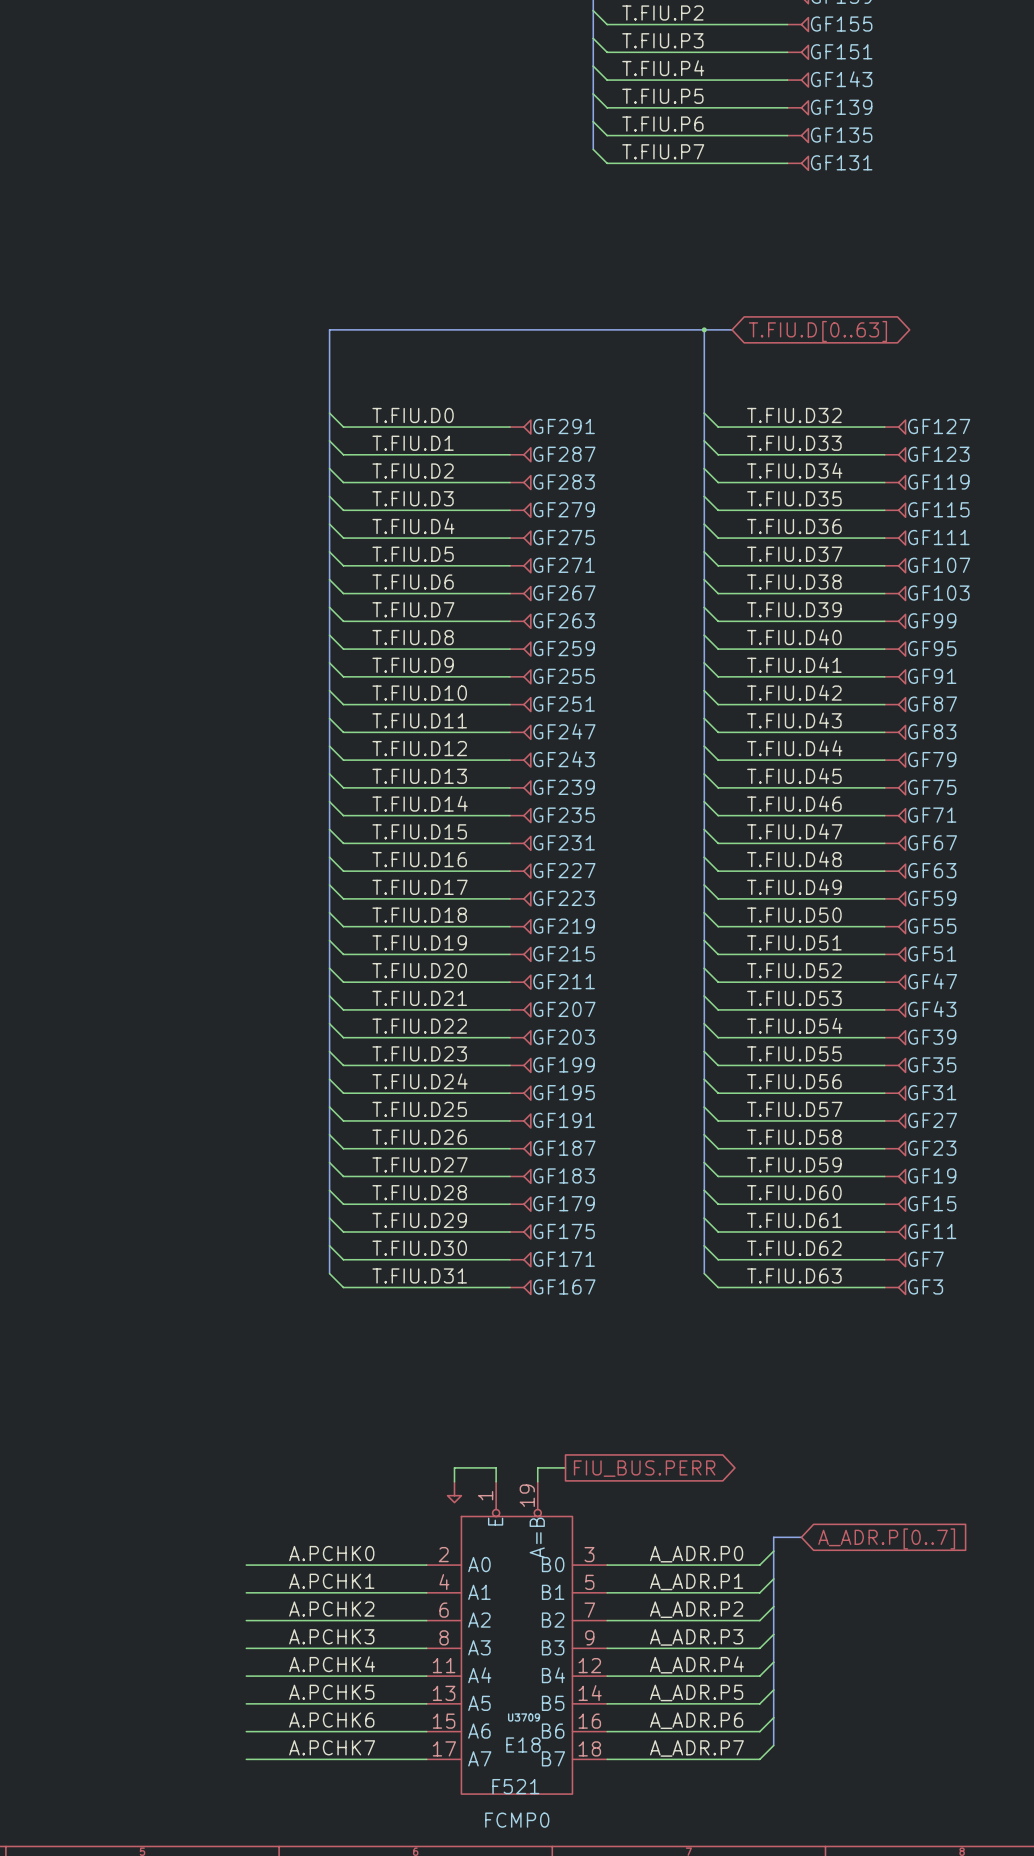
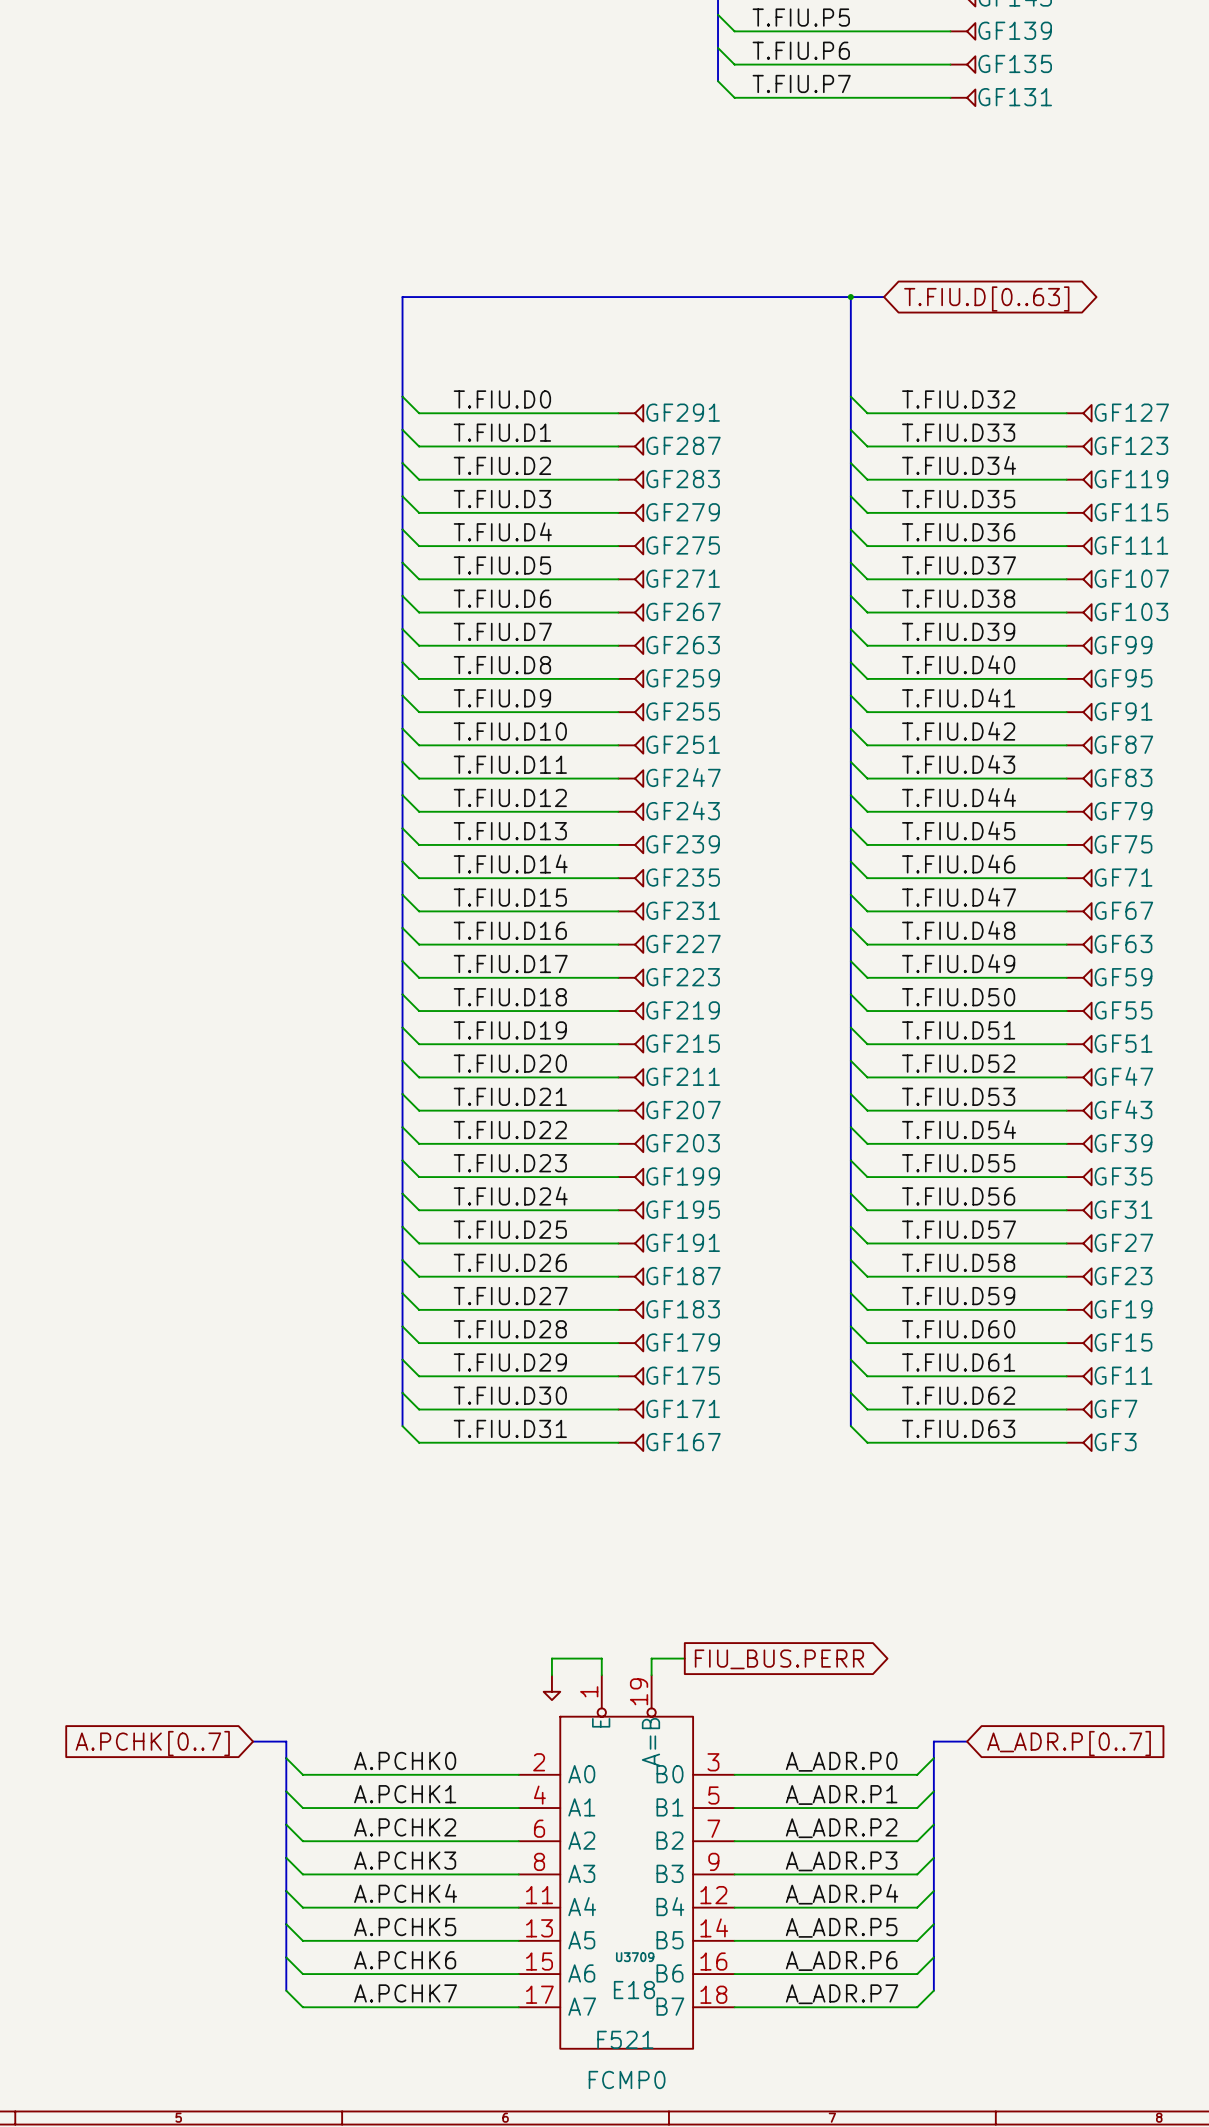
bus: none -> (253, 1741) (286, 1741) (286, 1990)
global label: none -> A.PCHK[0..7] (152, 1743)
wire: none -> (286, 1758) (302, 1774)
wire: none -> (286, 1791) (302, 1808)
wire: none -> (286, 1824) (302, 1841)
wire: none -> (286, 1857) (302, 1874)
wire: none -> (286, 1891) (302, 1907)
wire: none -> (286, 1924) (302, 1940)
wire: none -> (286, 1957) (302, 1974)
wire: none -> (286, 1990) (302, 2007)

